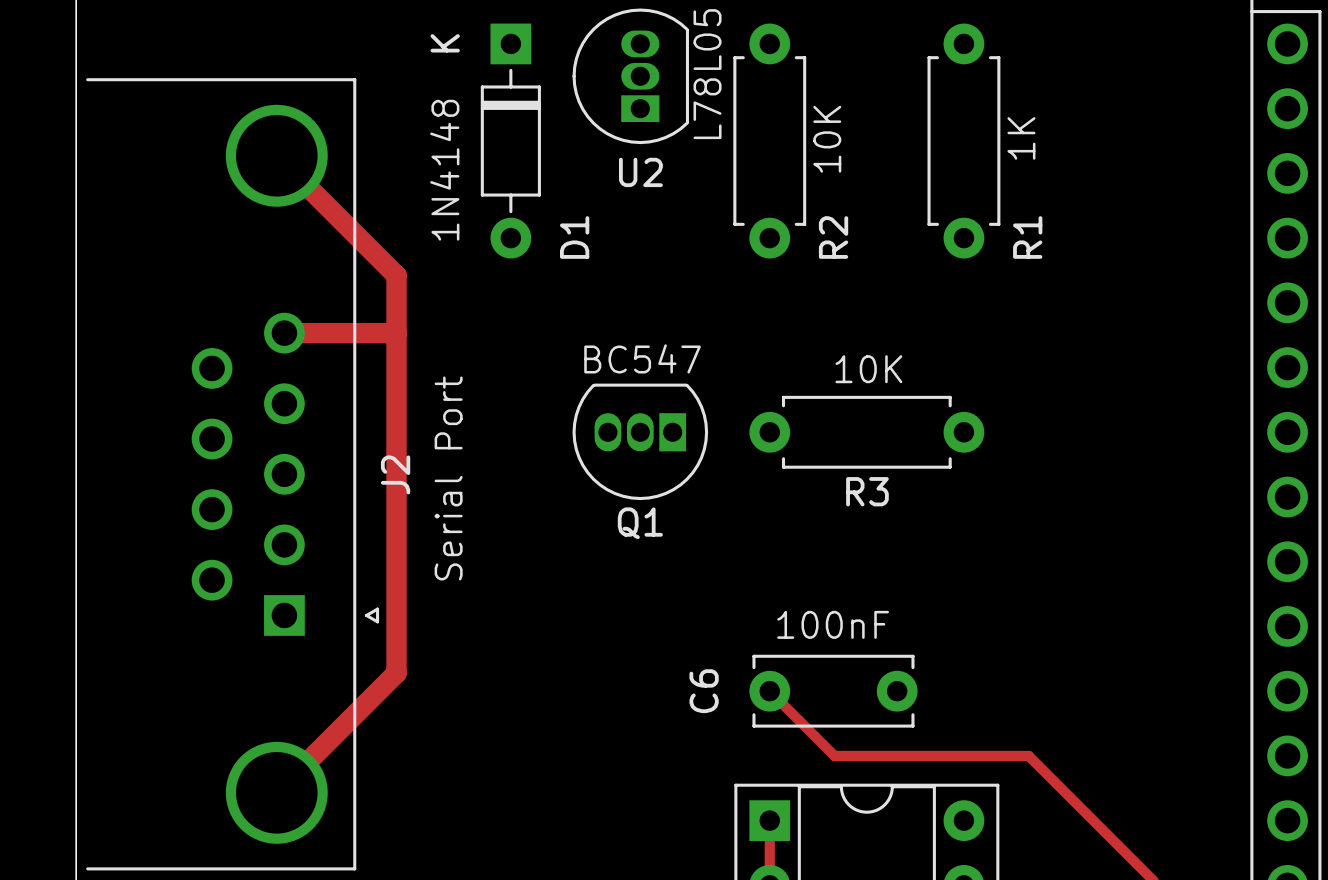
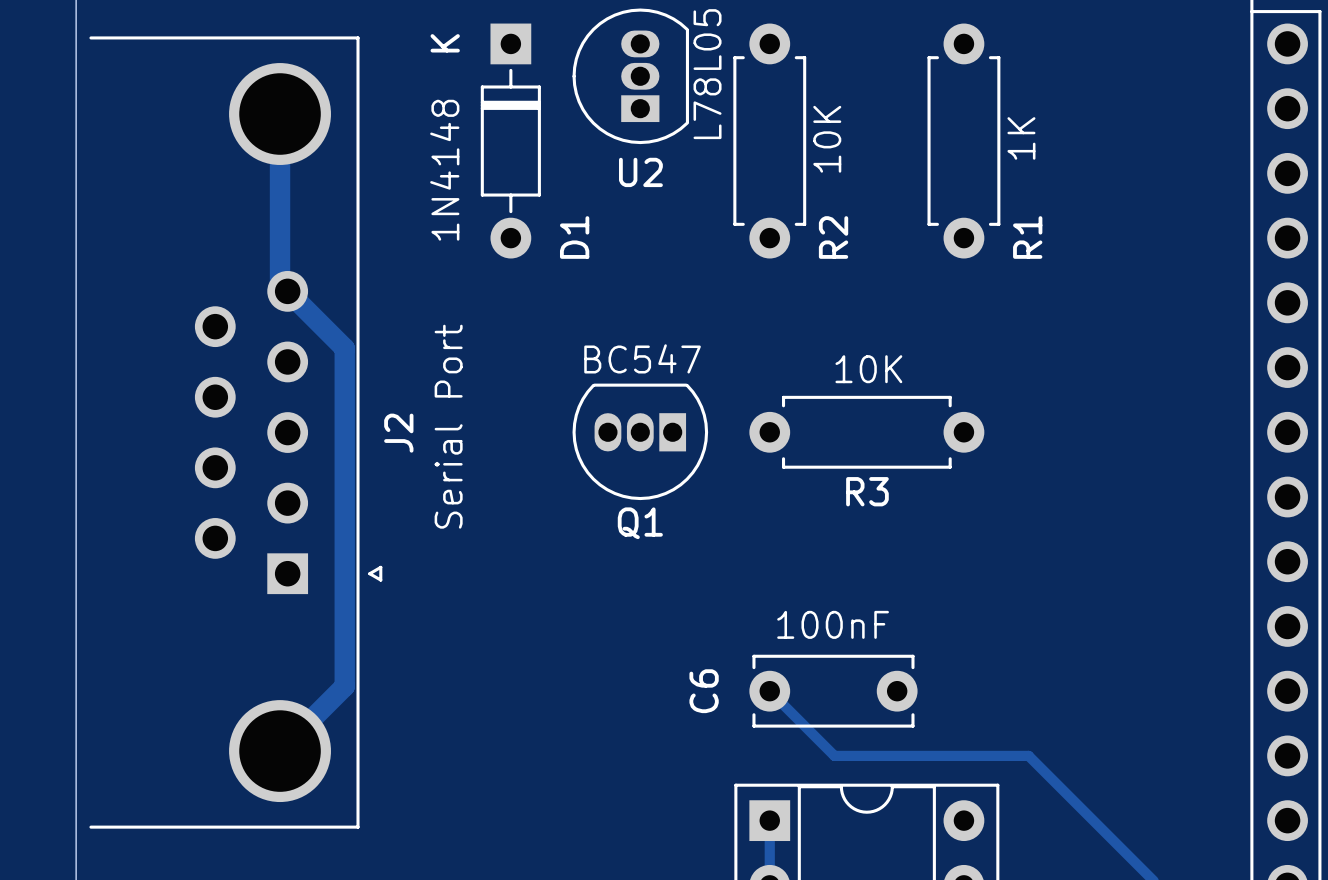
track: none -> (280, 114) (280, 283)
track: (276, 155) (396, 275) (396, 673) (276, 792) -> none
track: none -> (287, 291) (344, 348) (344, 686) (280, 751)
track: (284, 333) (396, 333) -> none
J2 position: (232, 474) -> (235, 432)
text position: Serial Port (448, 478) -> Serial Port (448, 426)

